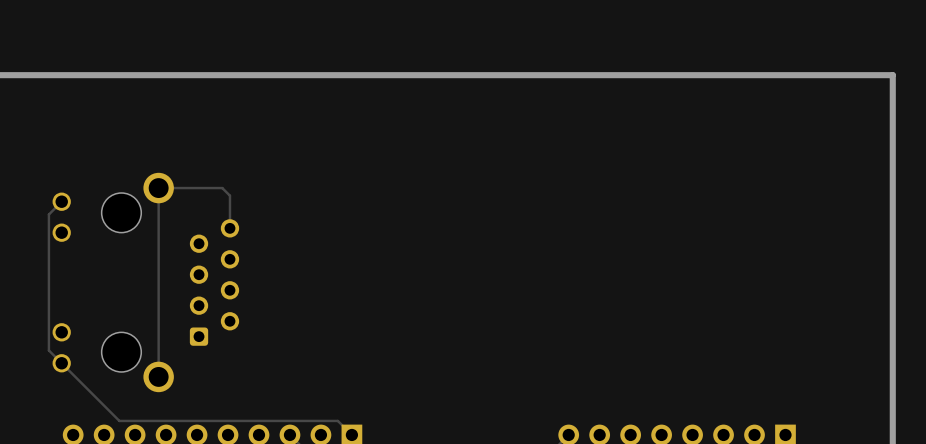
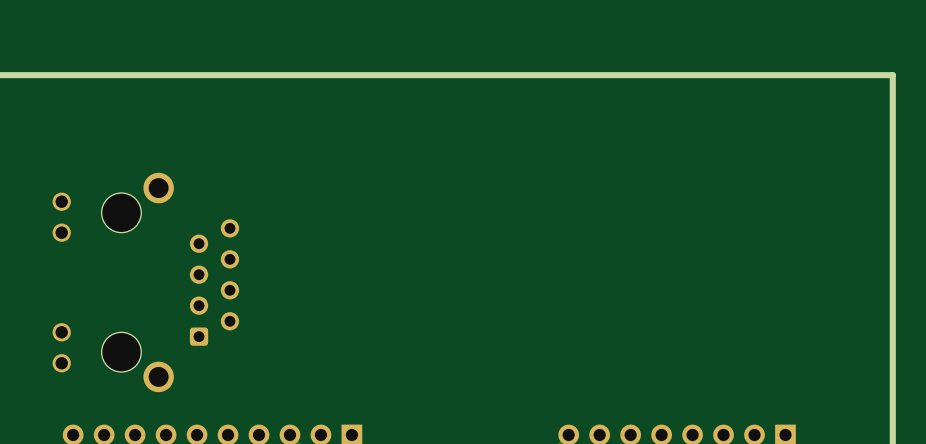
track: (61, 201) (48, 214) (48, 350) (119, 420) (337, 420) (351, 434) -> none
track: (229, 228) (229, 195) (222, 188) (158, 188) (158, 376) -> none

